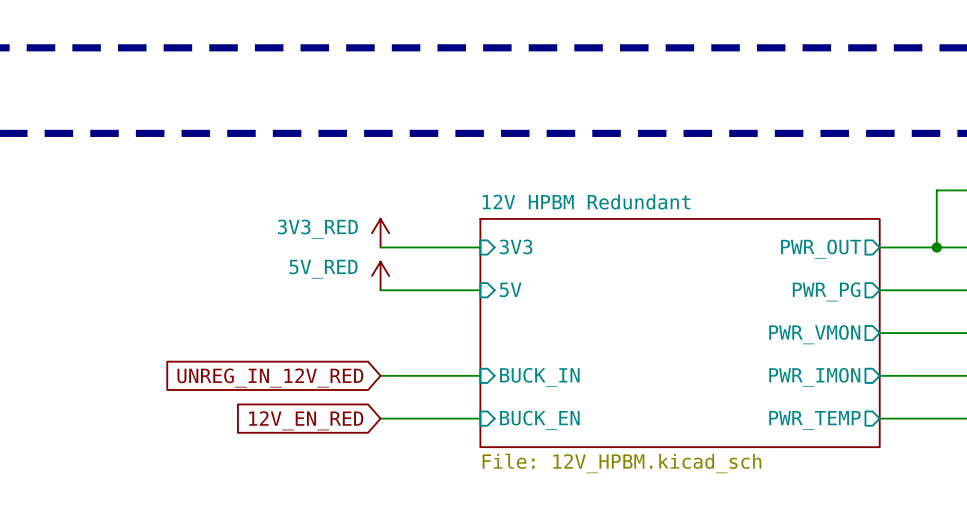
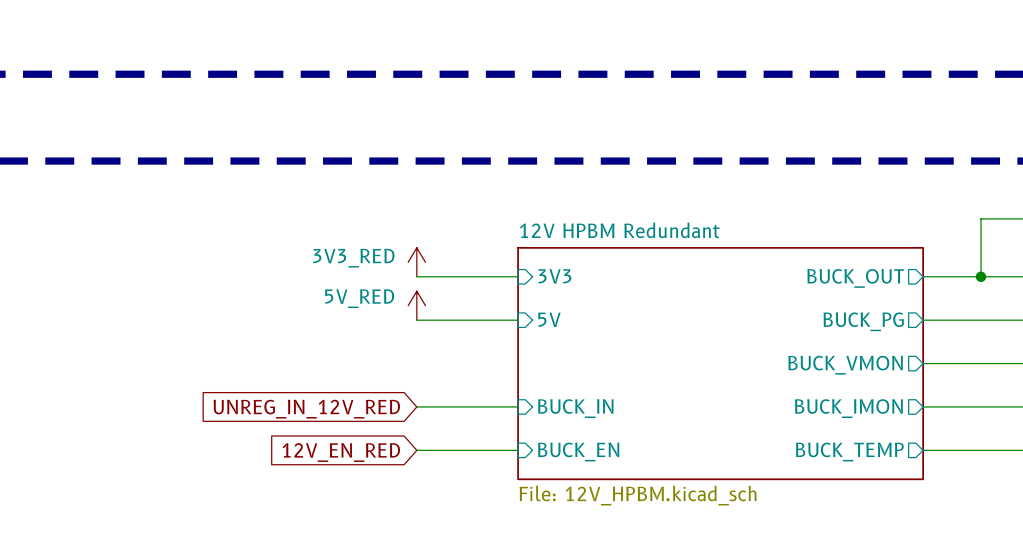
sheet pin: PWR_OUT (821, 249) -> BUCK_OUT (855, 278)
sheet pin: PWR_PG (826, 291) -> BUCK_PG (863, 321)
sheet pin: PWR_VMON (814, 334) -> BUCK_VMON (845, 365)
sheet pin: PWR_IMON (814, 377) -> BUCK_IMON (848, 408)
sheet pin: PWR_TEMP (815, 420) -> BUCK_TEMP (849, 451)

